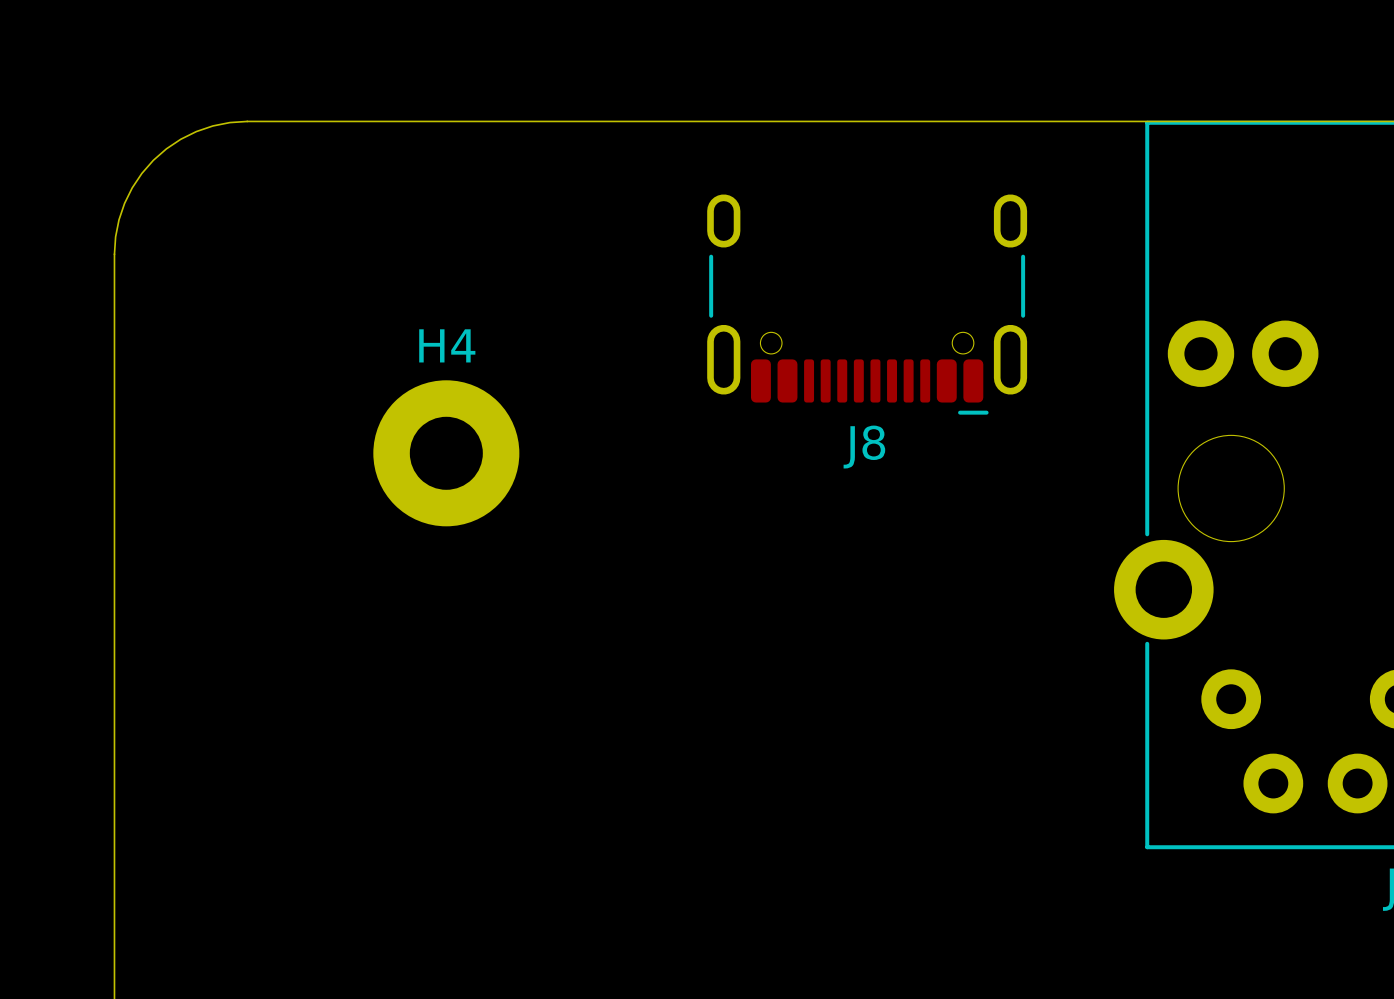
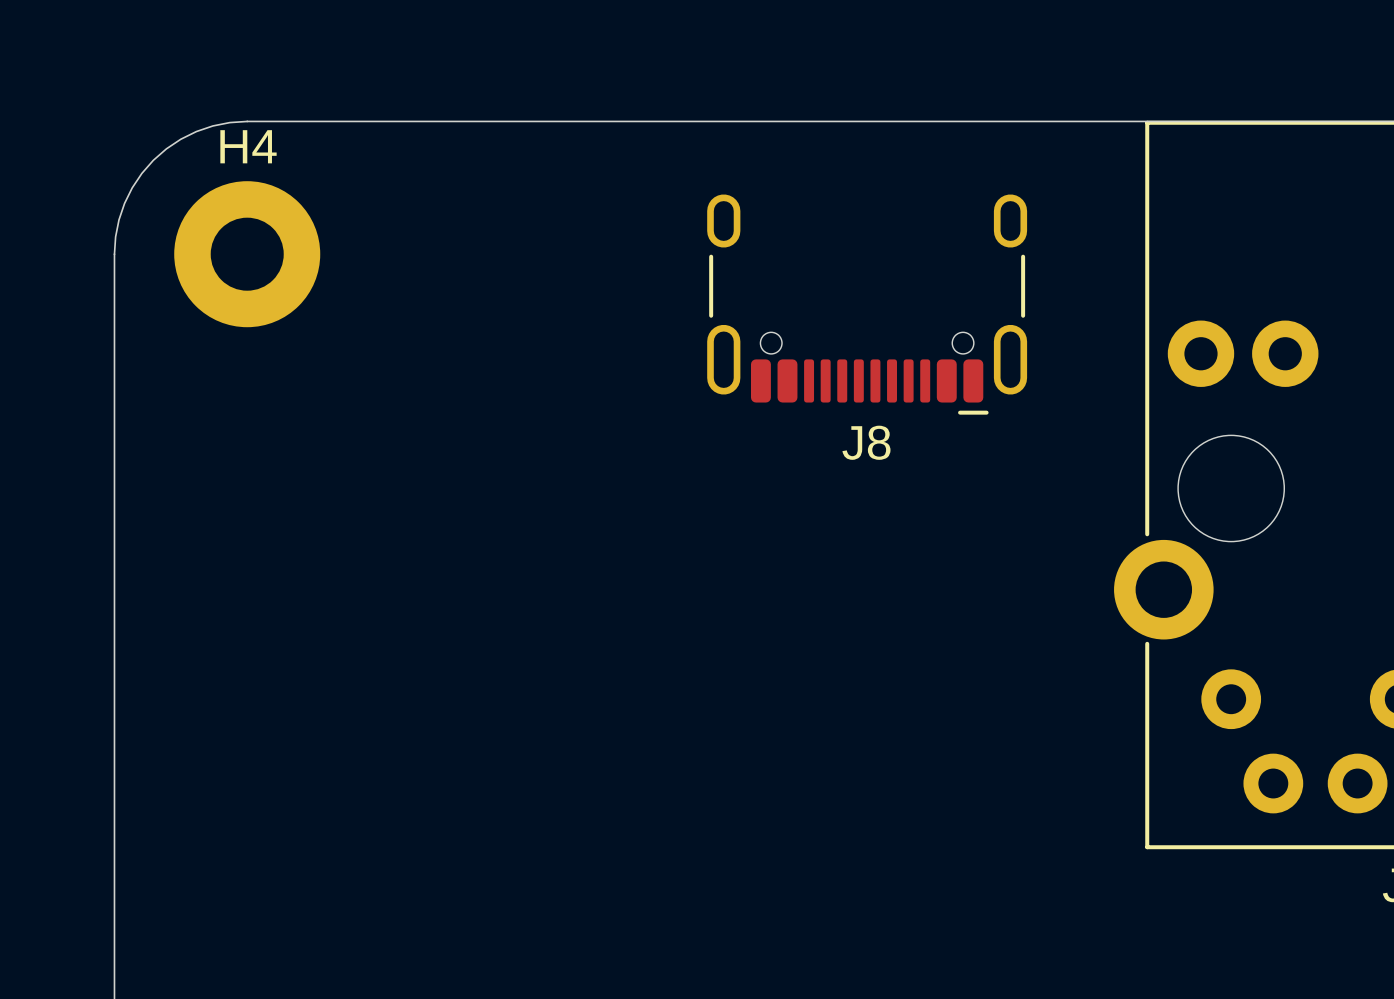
H4 position: (446, 453) -> (247, 254)

